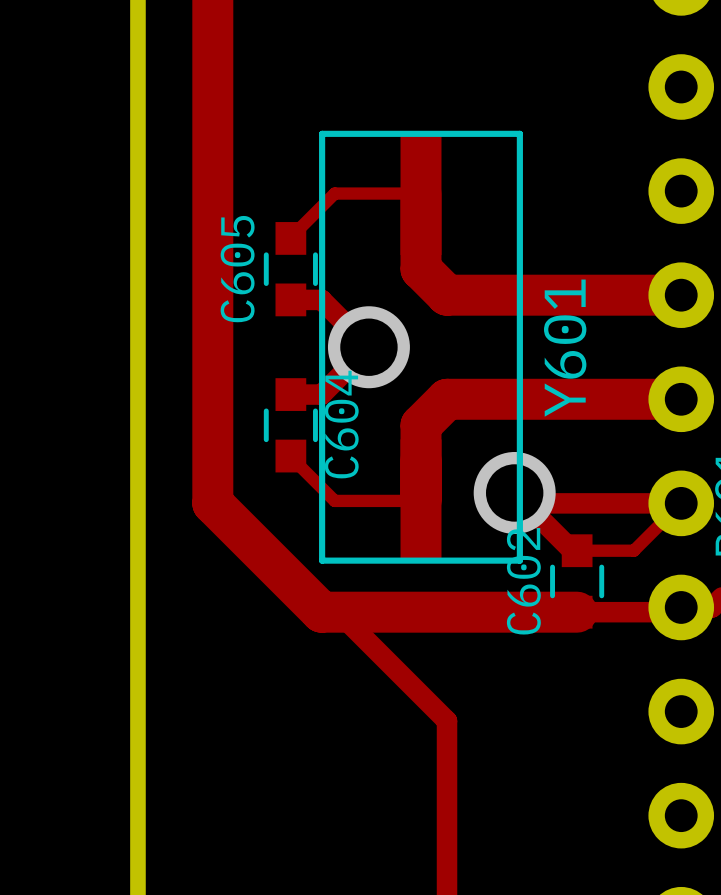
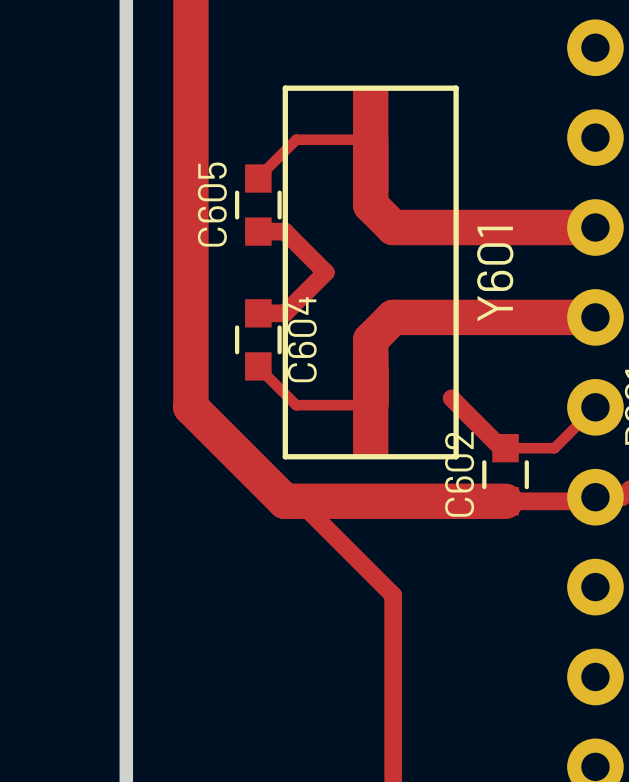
via: (368, 347) -> none
via: (514, 492) -> none
top track: (525, 503) (681, 503) -> none

